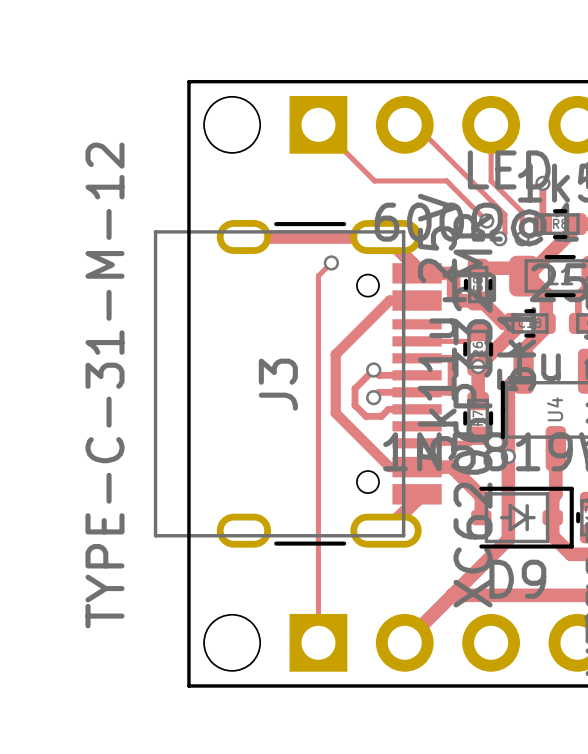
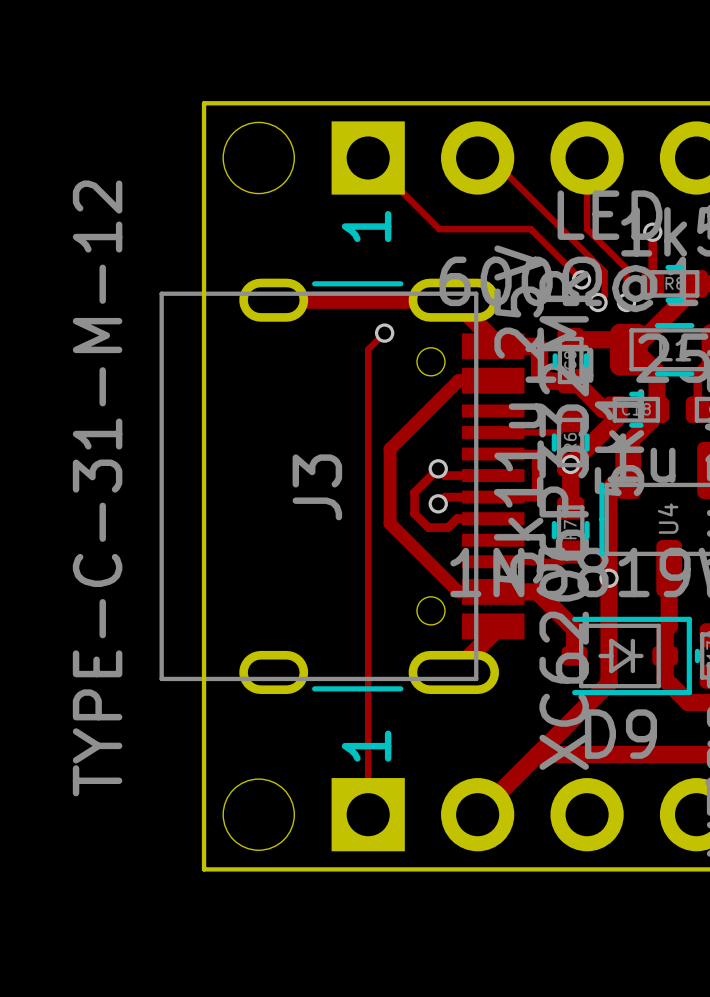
text: none -> 1 (366, 226)
text: none -> 1 (366, 746)

